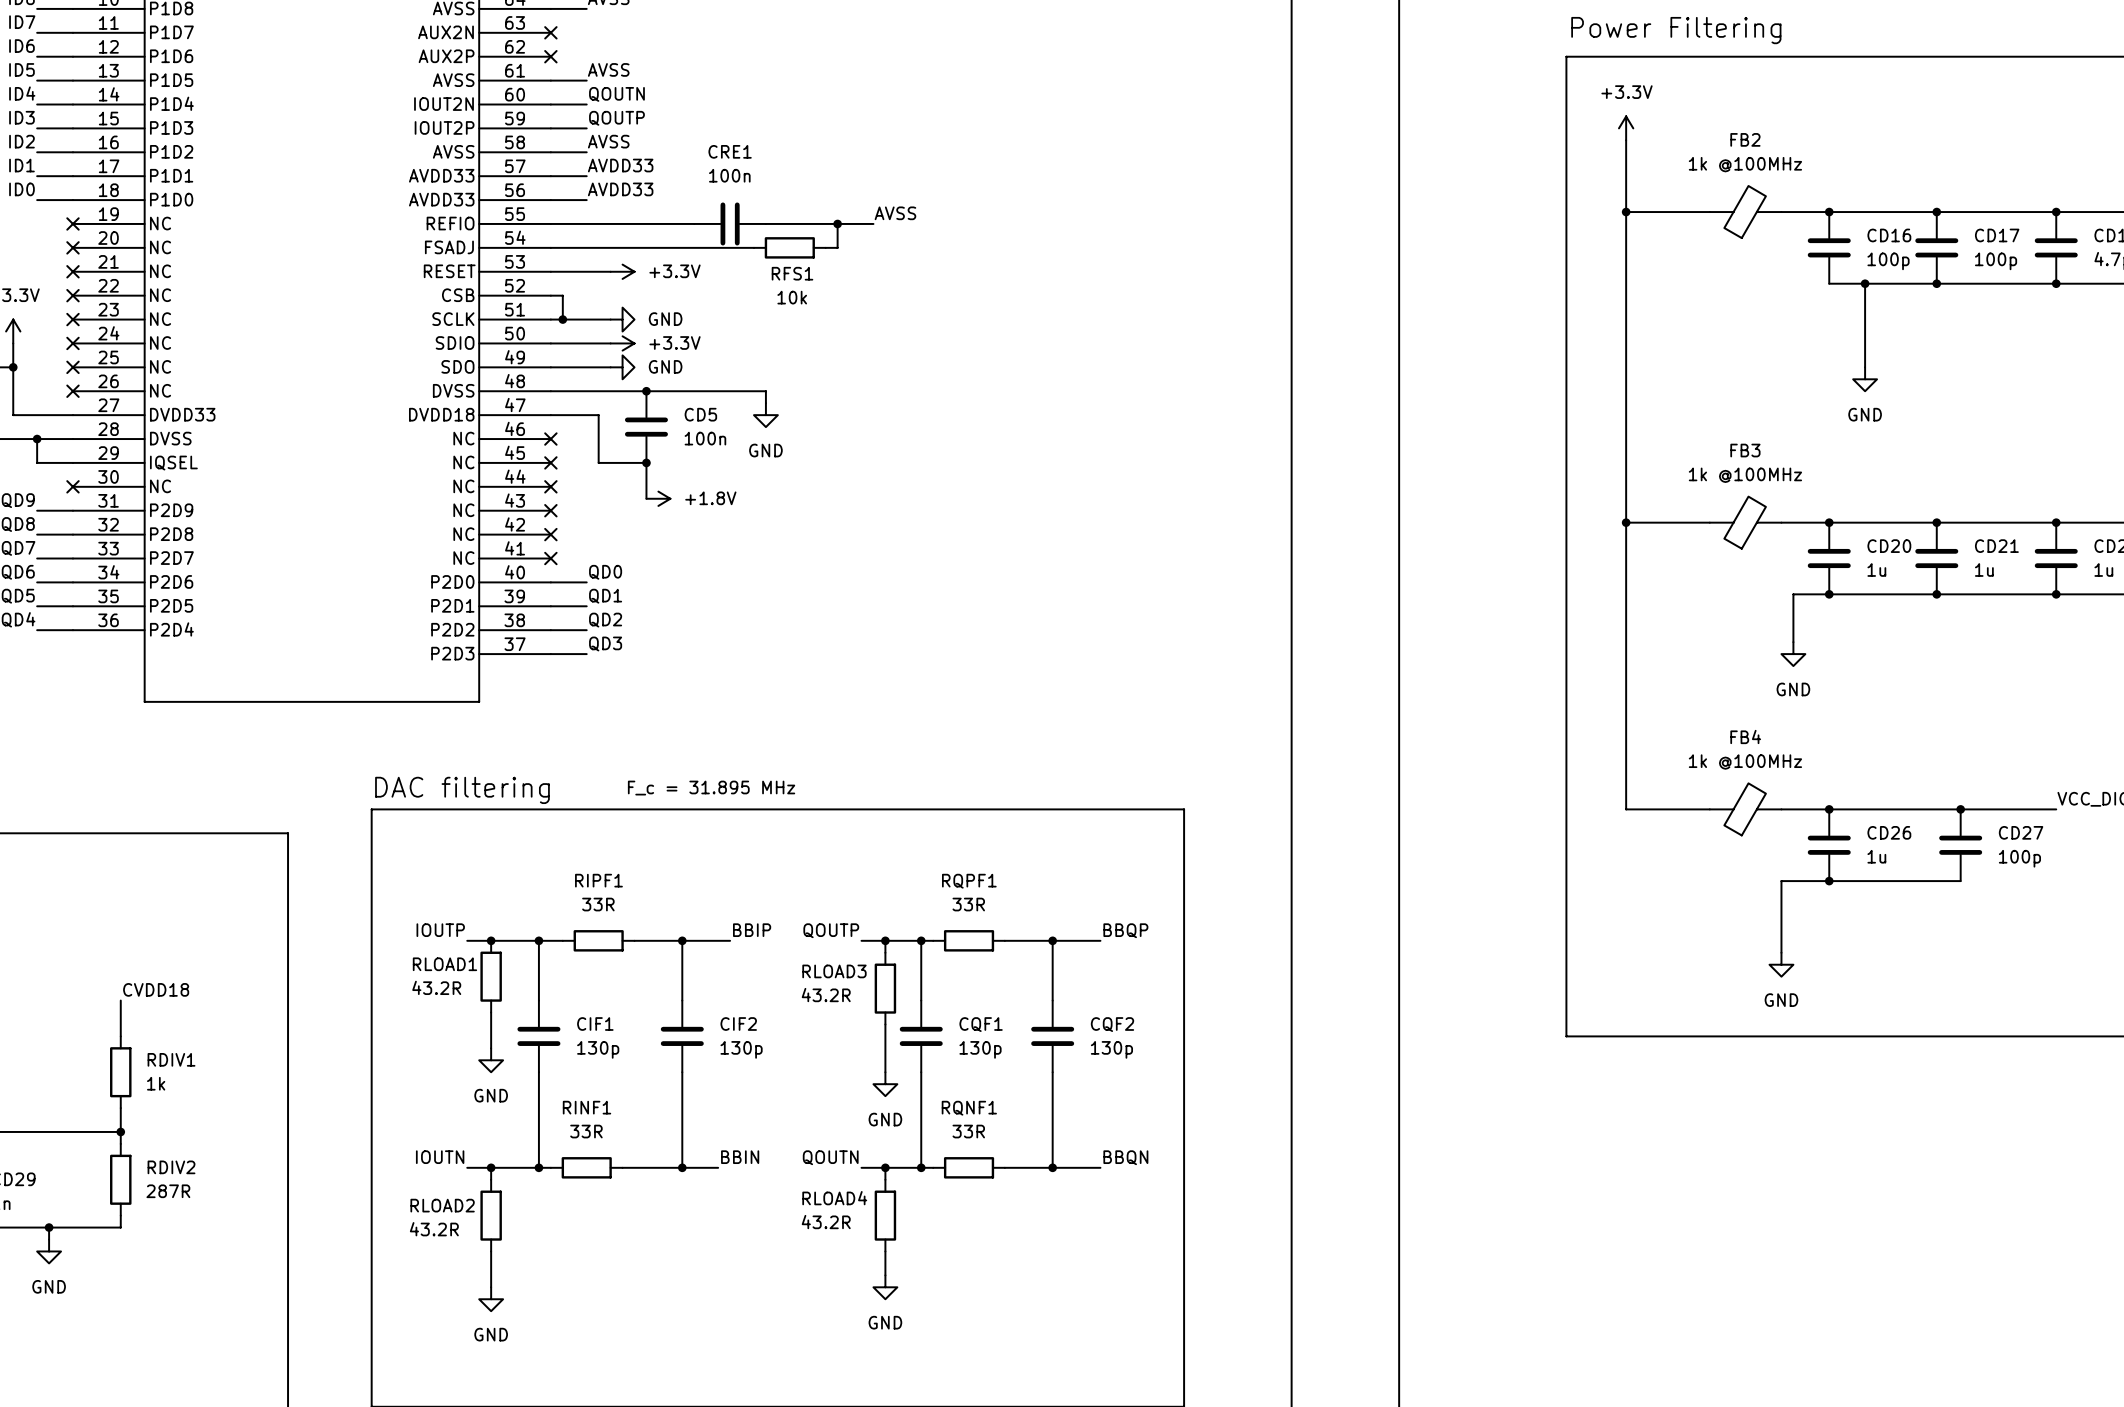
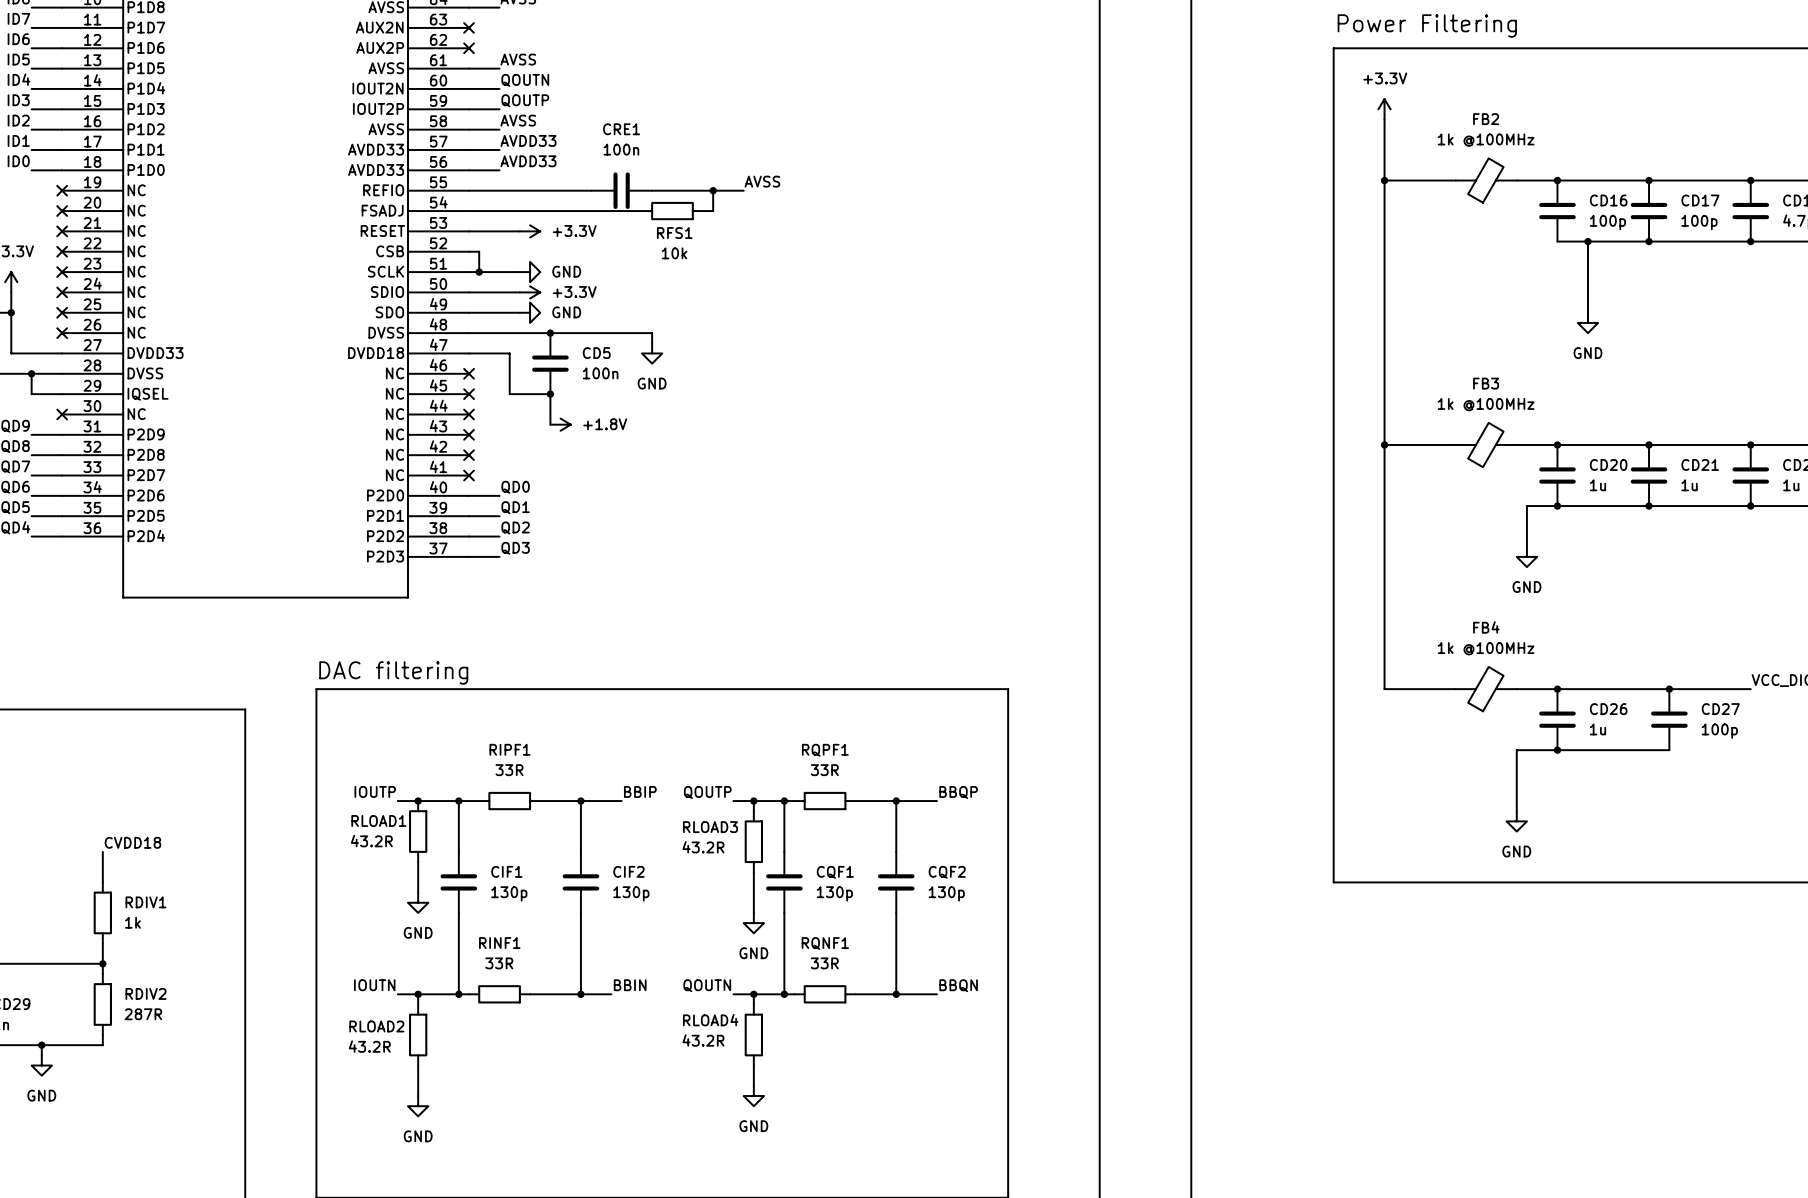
text: F_c = 31.895 MHz (711, 788) -> none

